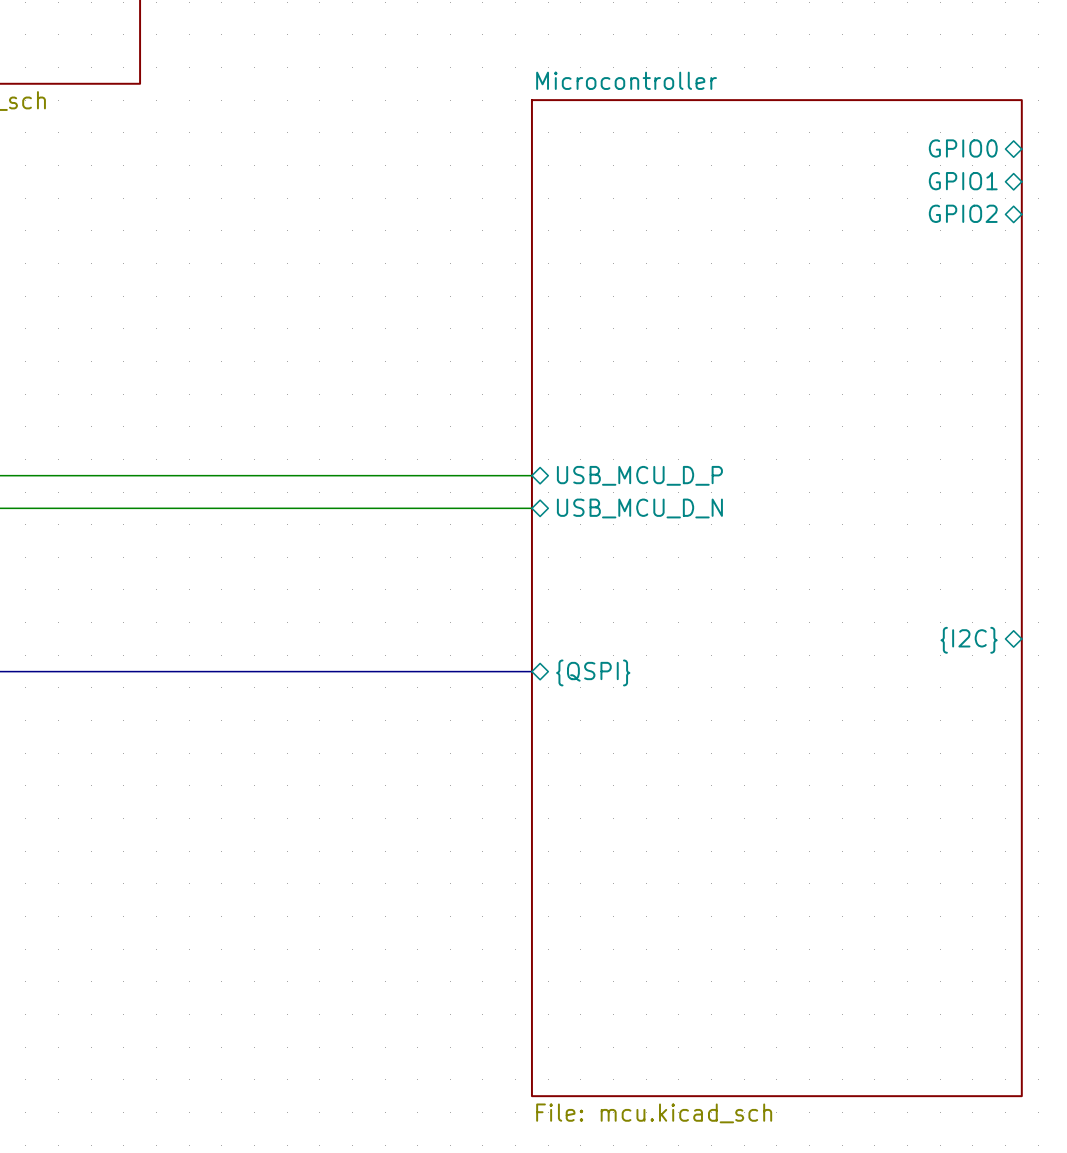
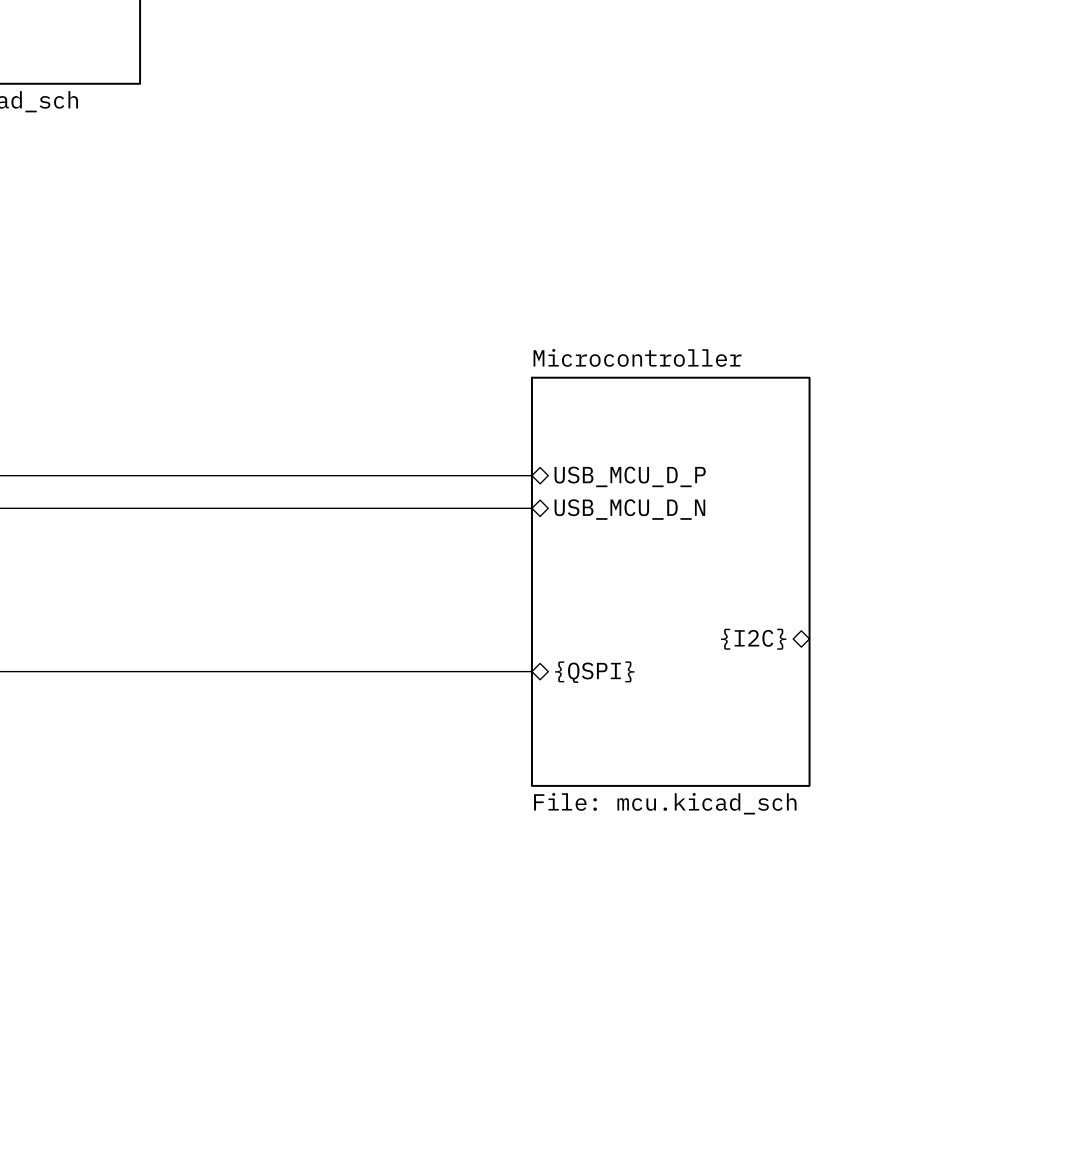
sheet pin: GPIO0 (963, 148) -> none
sheet pin: GPIO1 (963, 181) -> none
sheet pin: GPIO2 (963, 213) -> none
sheet Microcontroller: none -> File: mcu.kicad_sch (670, 581)
sheet Microcontroller: File: mcu.kicad_sch (776, 598) -> none
sheet pin position: {I2C} (969, 640) -> {I2C} (753, 639)

